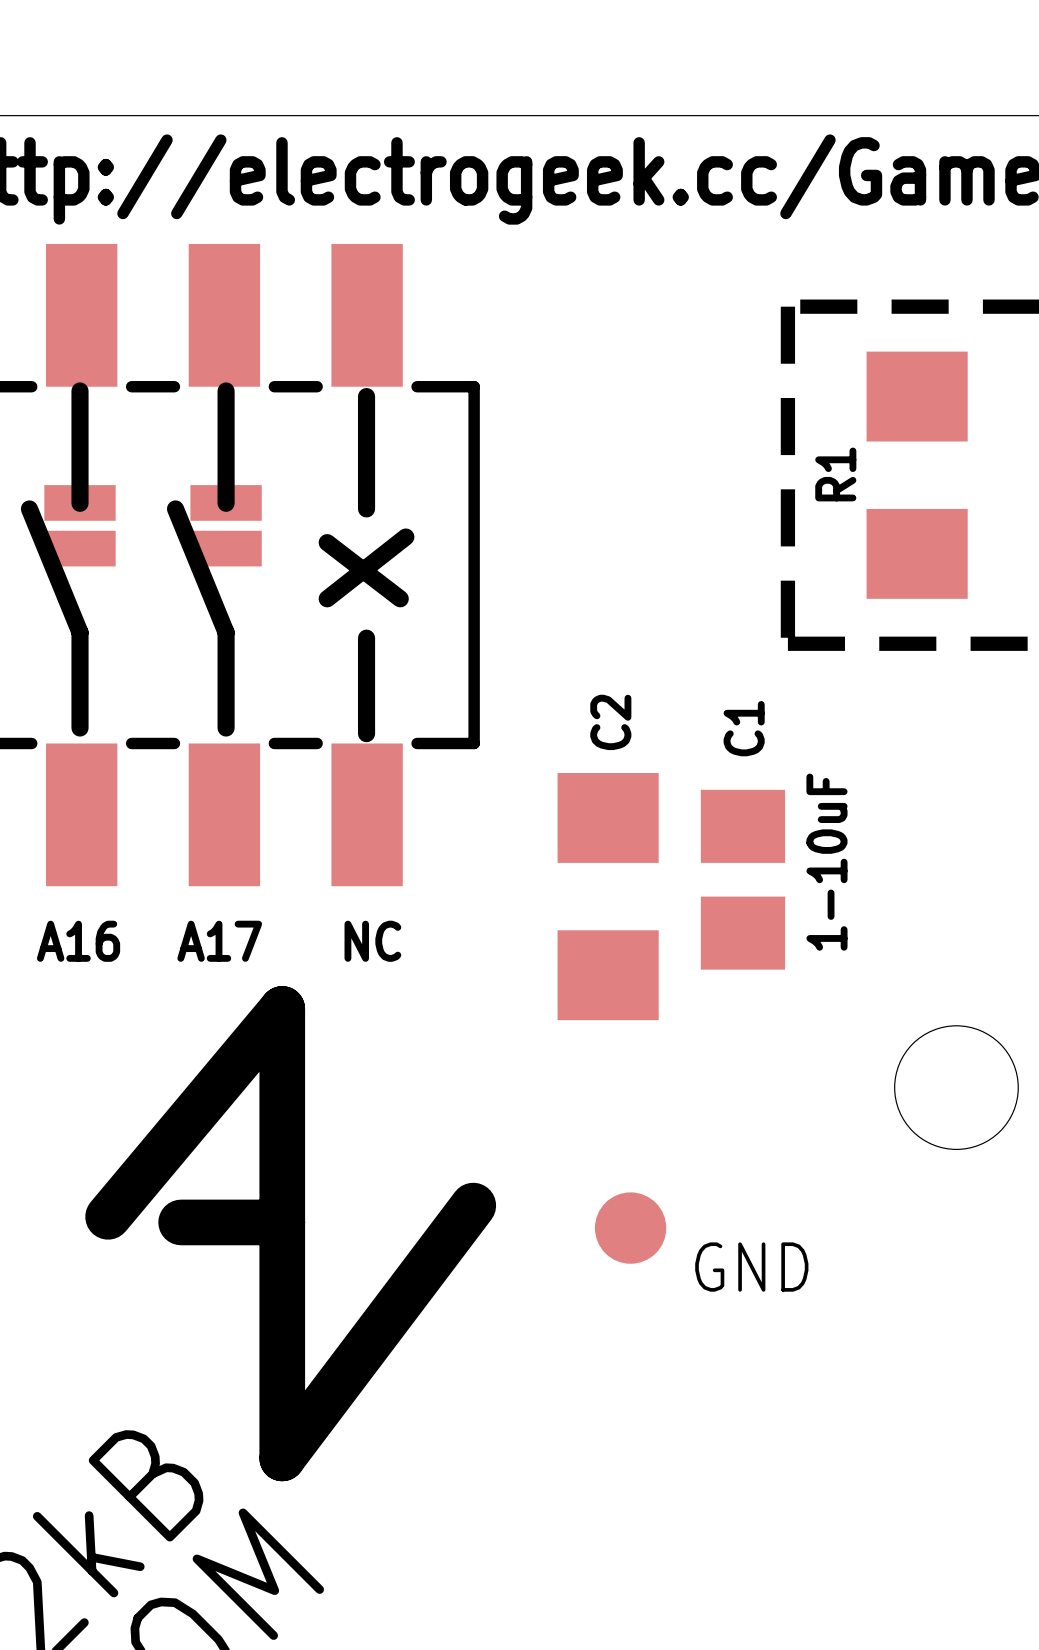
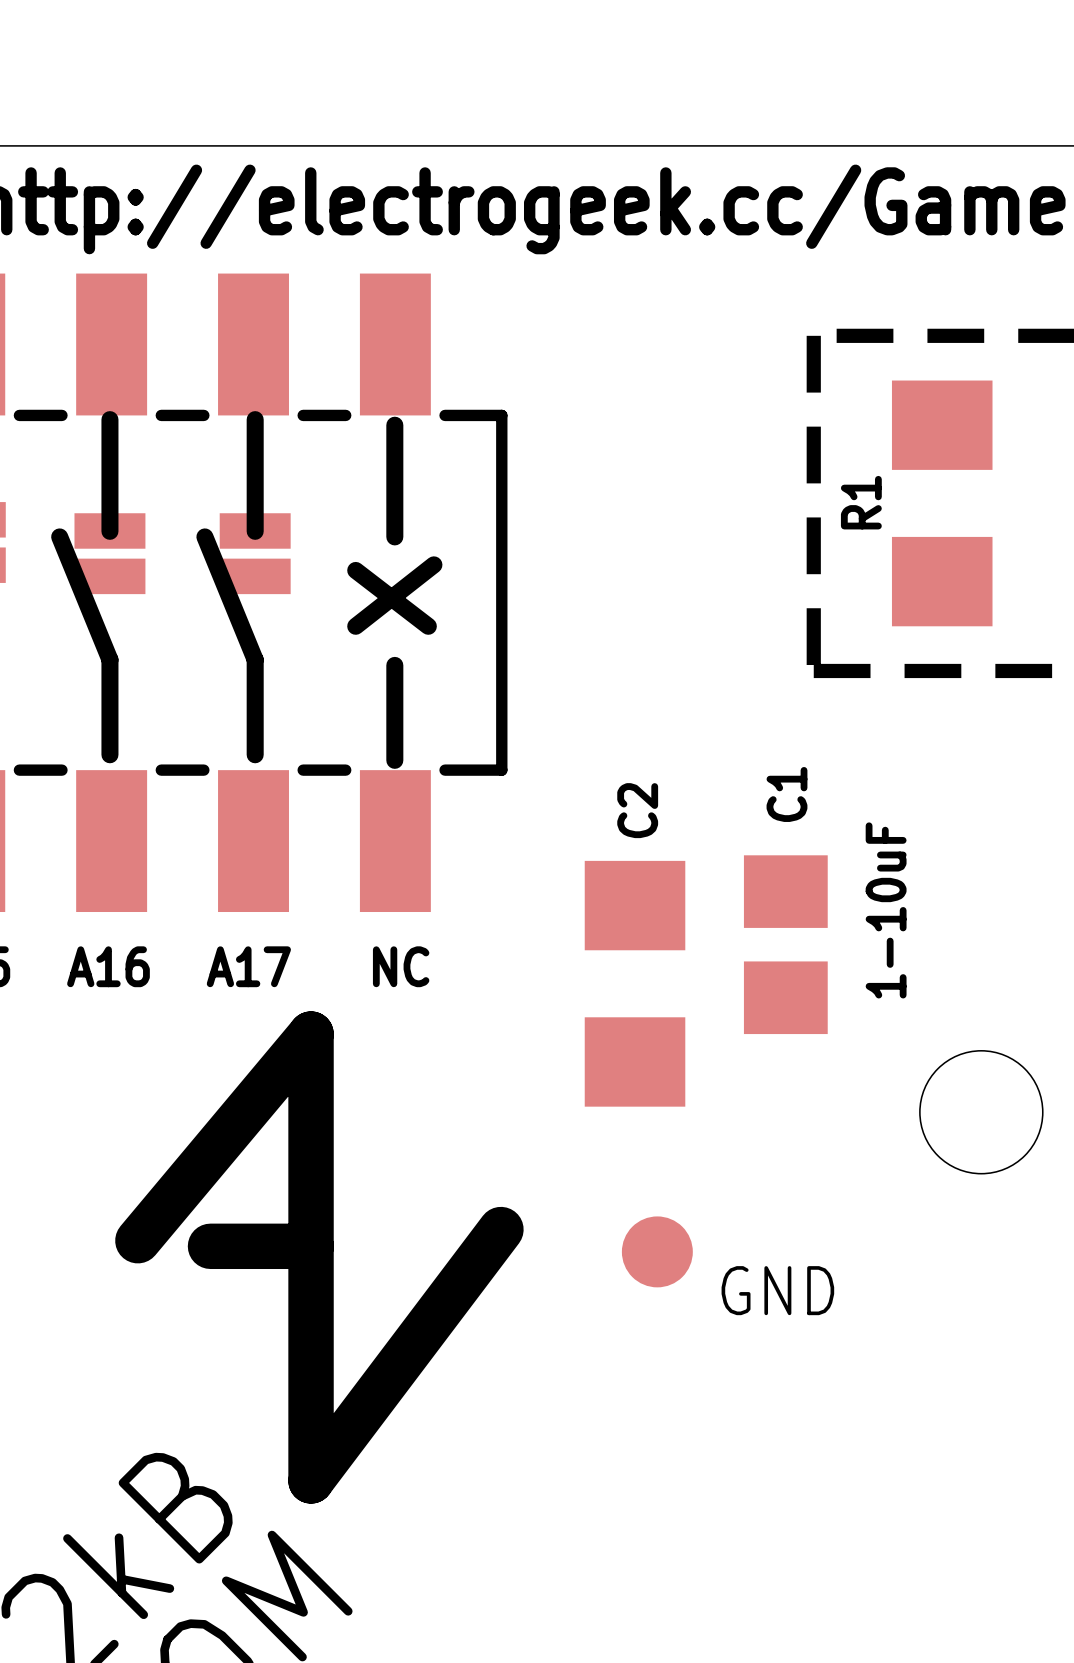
text position: 1-10uF (826, 862) -> 1-10uF (886, 910)
C1 position: (742, 879) -> (785, 944)
C2 position: (608, 896) -> (635, 983)

